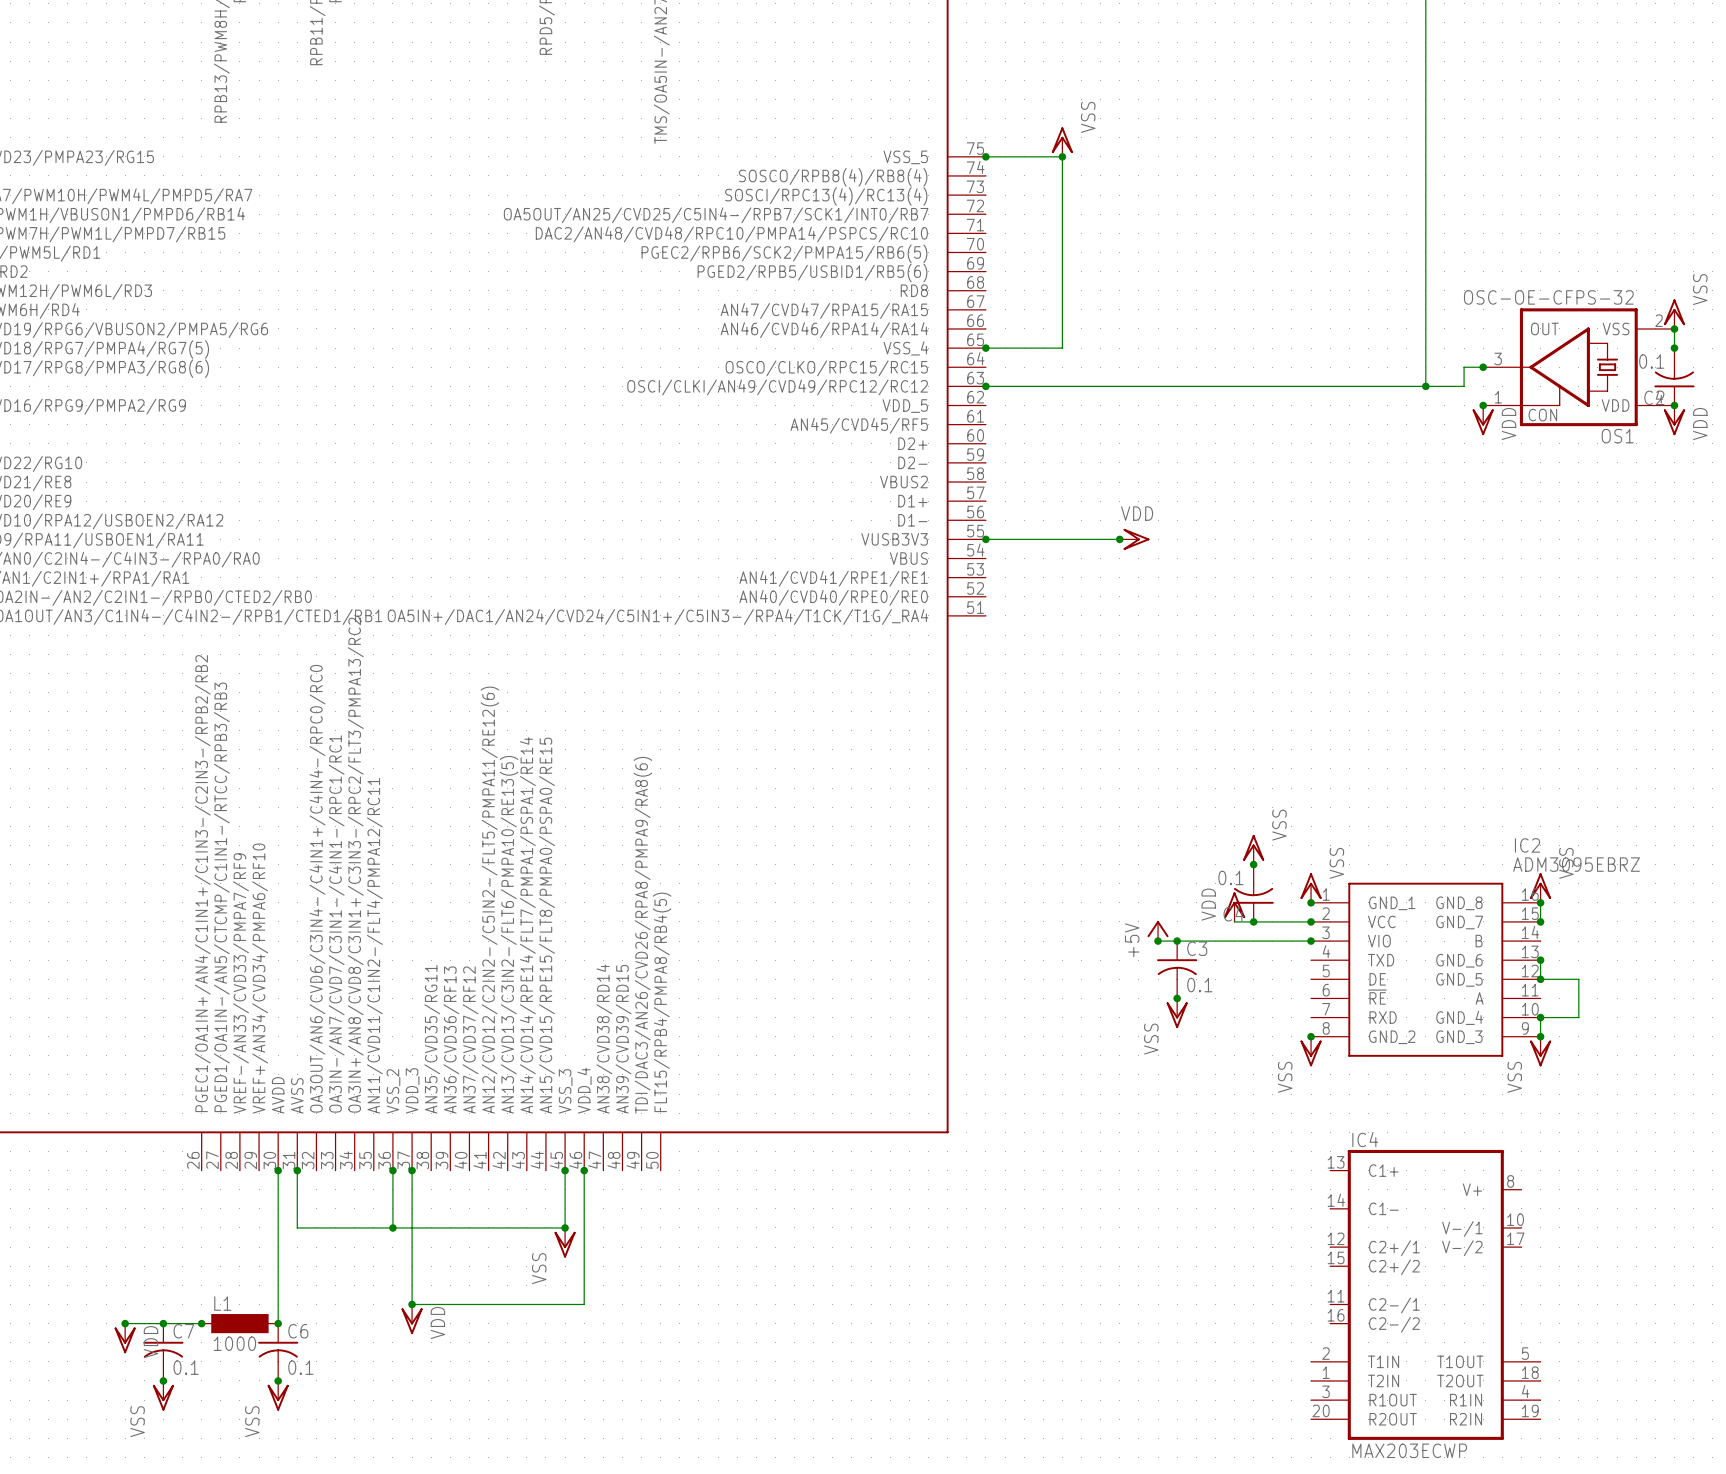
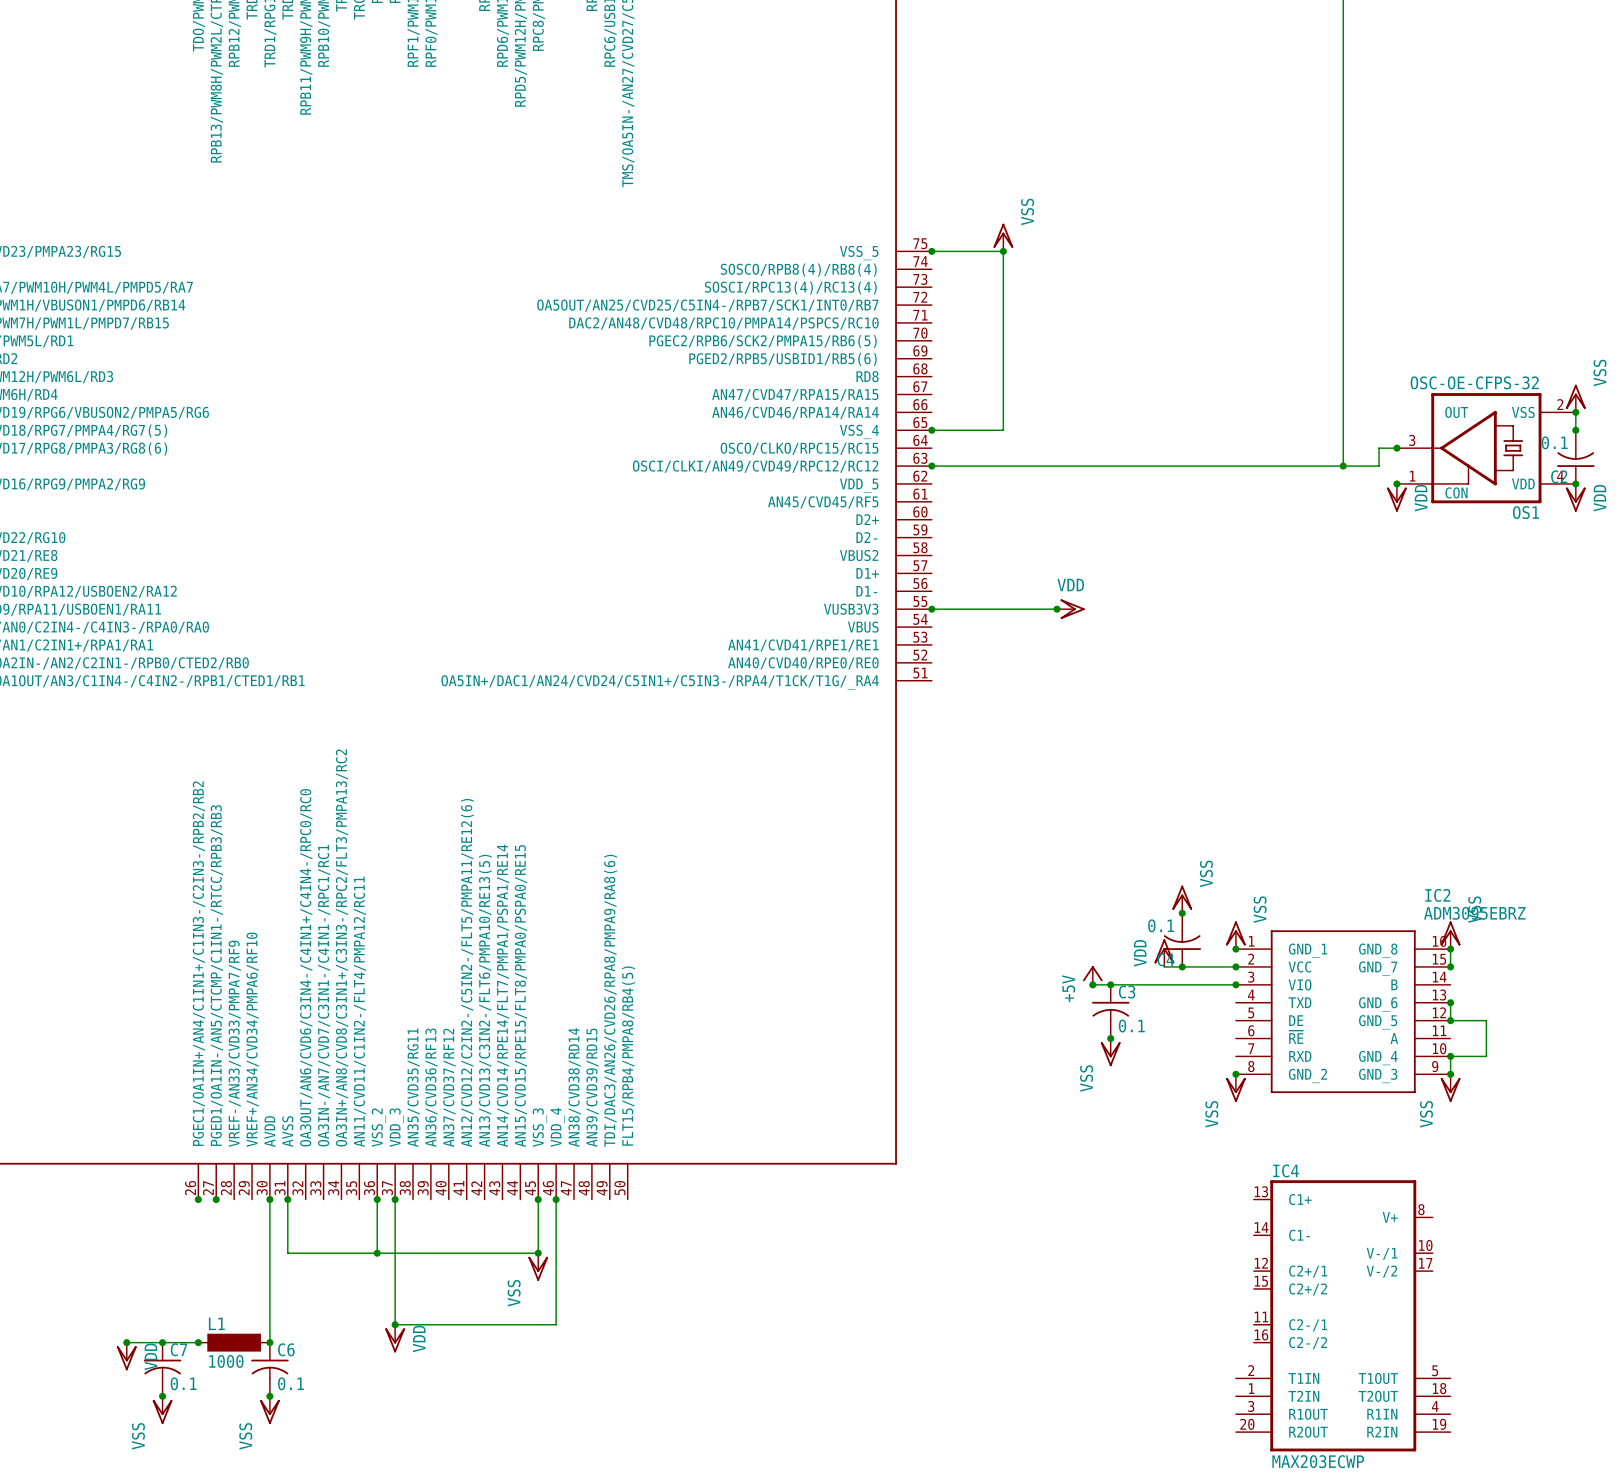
junction: none -> (198, 1199)
junction: none -> (216, 1199)

